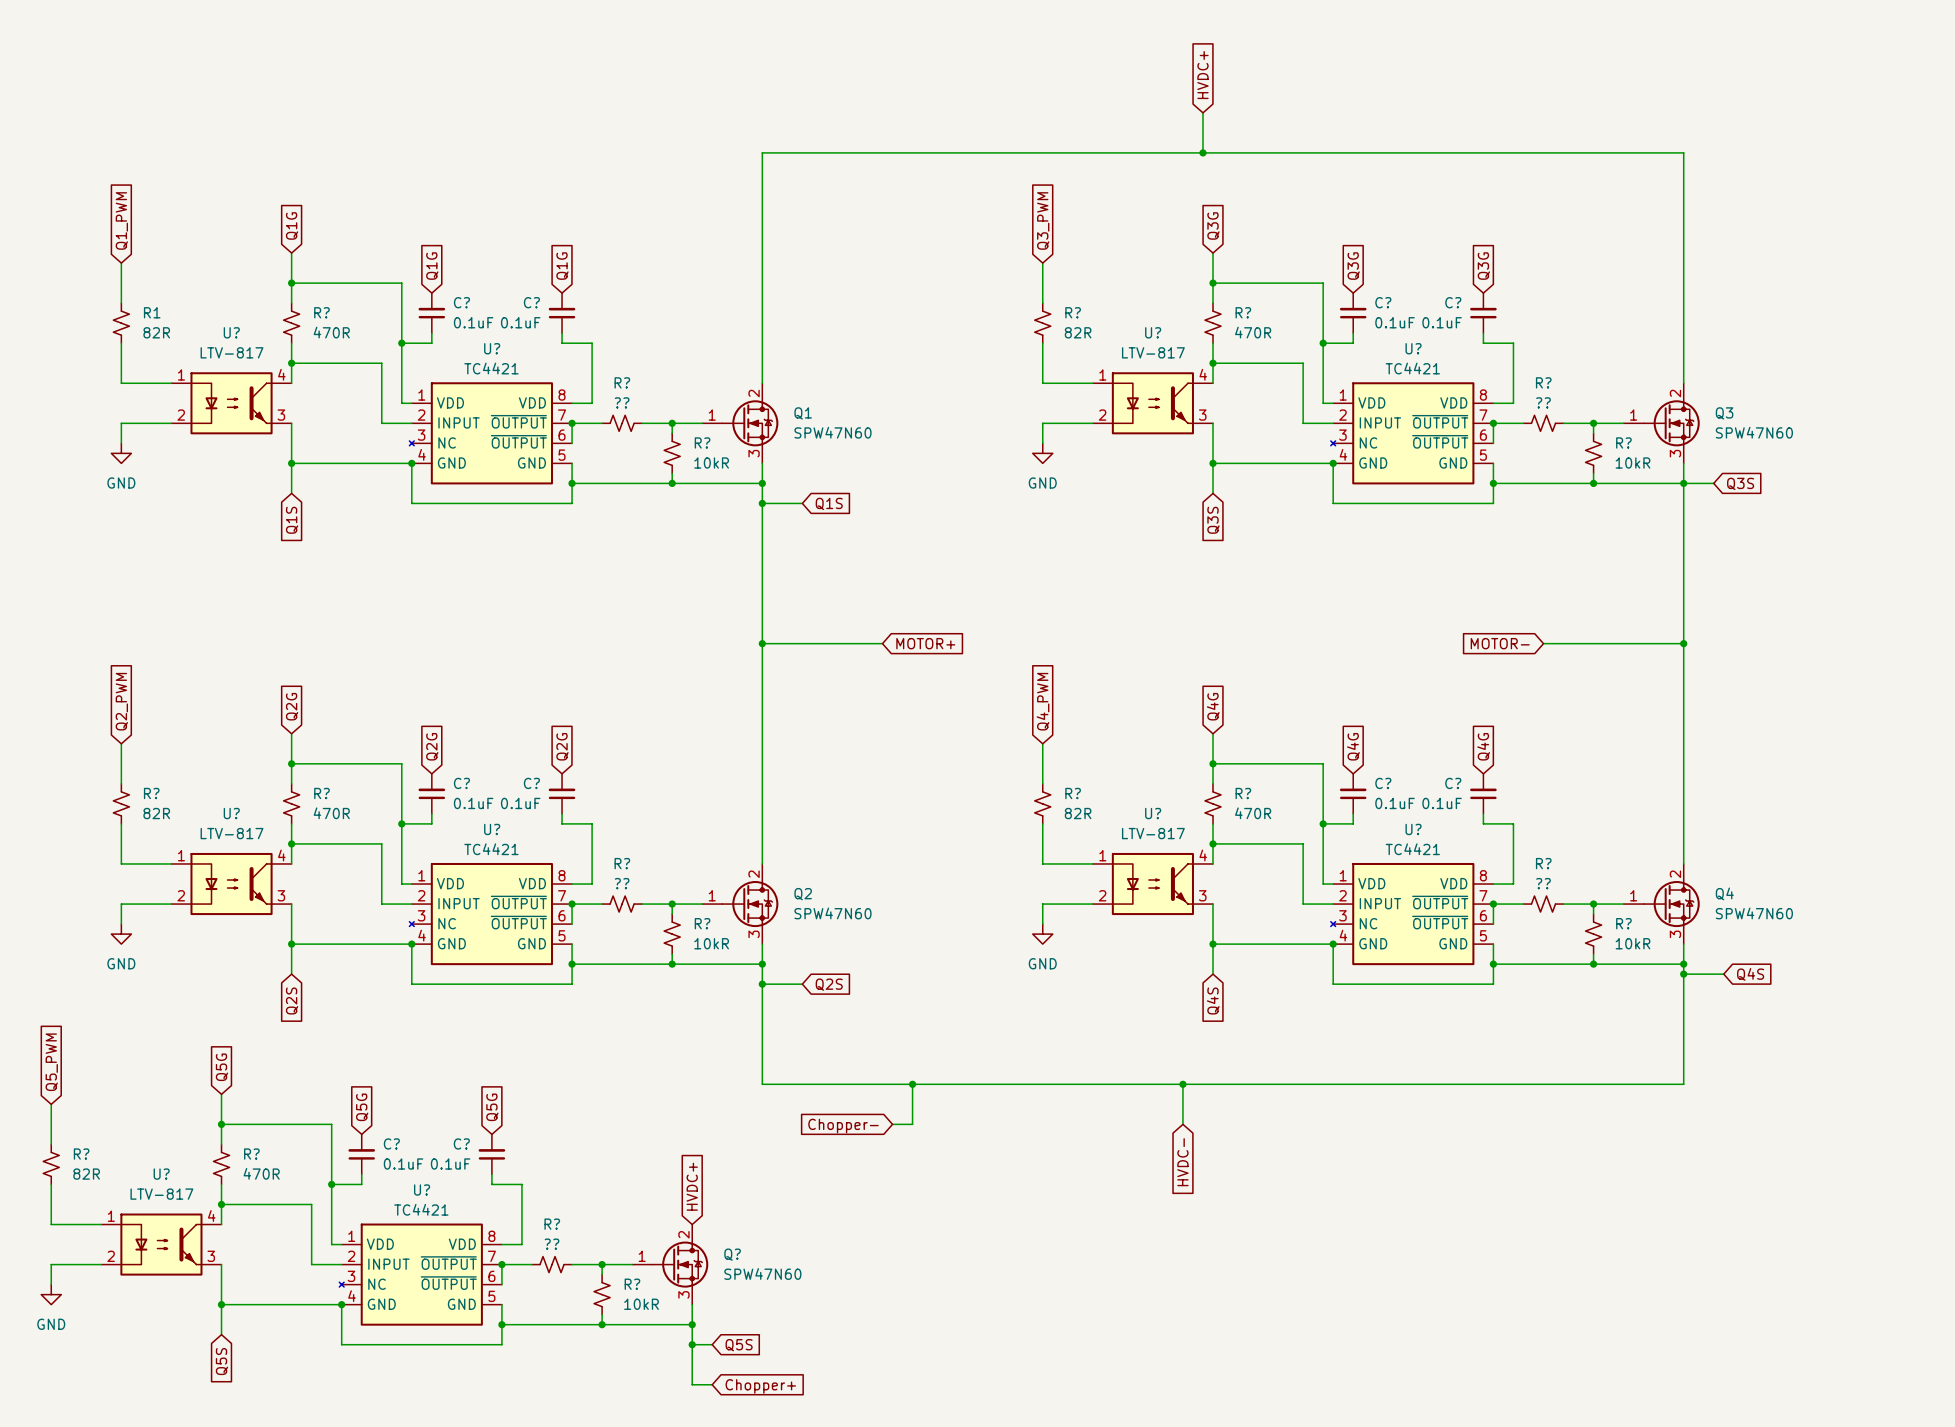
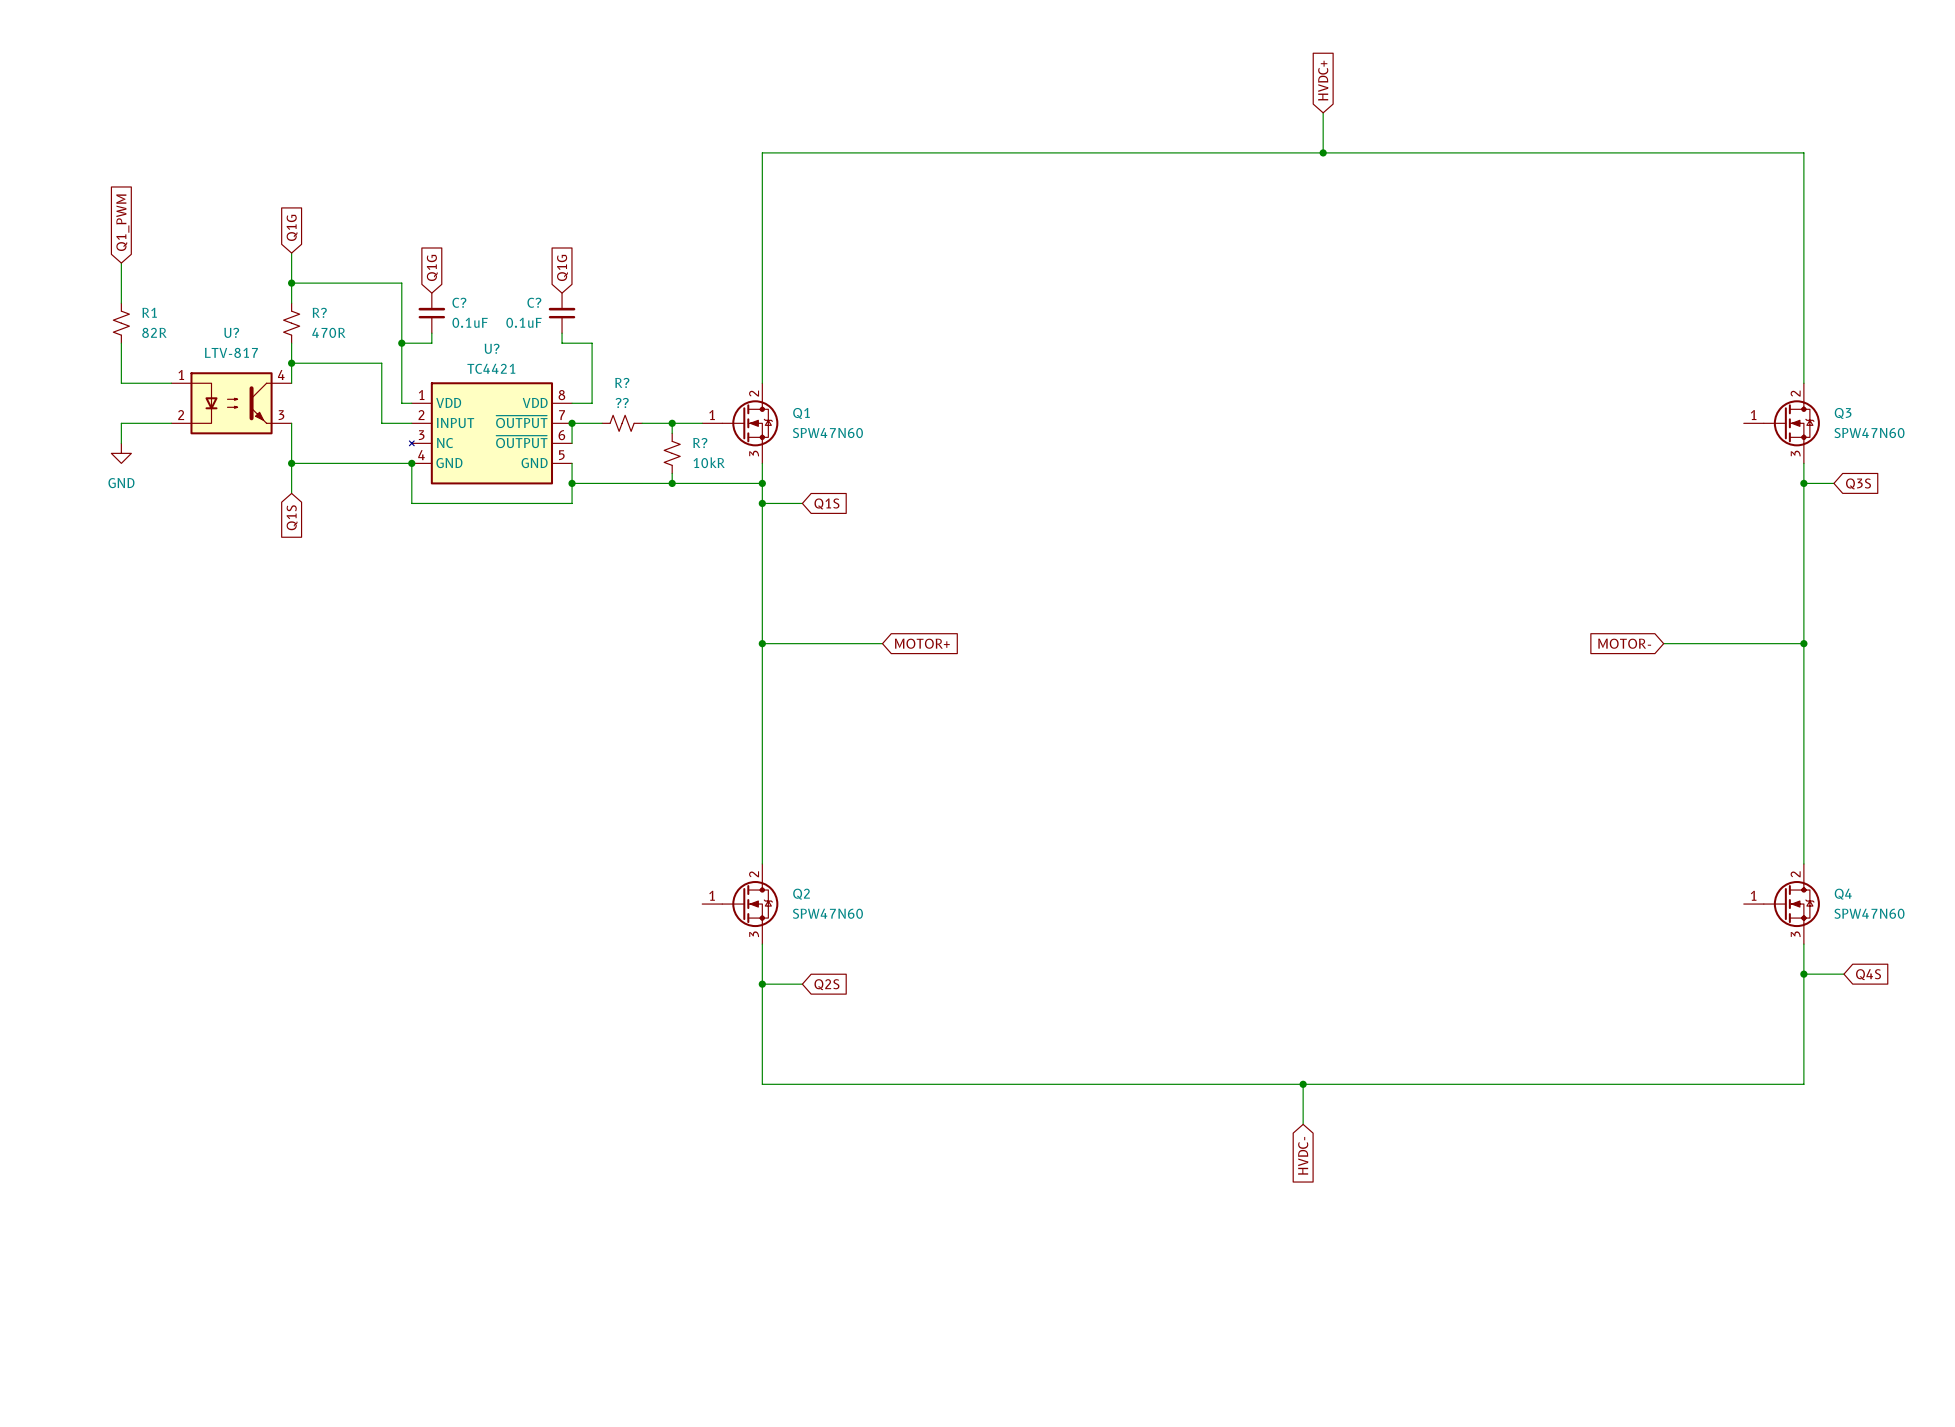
global label position: HVDC+ (1202, 75) -> HVDC+ (1323, 80)
wire: (1202, 112) (1202, 152) -> (1323, 112) (1323, 152)
junction: (1202, 152) -> none
junction: none -> (1323, 152)
wire: (1683, 152) (1683, 383) -> (1683, 152) (1803, 152) (1803, 383)
global label: Q3_PWM (1043, 220) -> none
global label: Q3G (1213, 225) -> none
wire: (1213, 253) (1213, 303) -> none
wire: (1042, 263) (1042, 303) -> none
global label: Q3G (1353, 266) -> none
global label: Q3G (1483, 266) -> none
wire: (1213, 283) (1323, 283) (1323, 403) (1333, 403) -> none
junction: (1213, 283) -> none
C?: 0.1uF (1353, 313) -> none
C?: 0.1uF (1483, 313) -> none
R?: 82R (1042, 323) -> none
R?: 470R (1213, 323) -> none
wire: (1353, 333) (1353, 343) (1323, 343) -> none
wire: (1483, 333) (1483, 343) (1513, 343) (1513, 403) (1493, 403) -> none
wire: (1042, 343) (1042, 383) (1092, 383) -> none
wire: (1213, 343) (1213, 383) -> none
junction: (1323, 343) -> none
wire: (1213, 363) (1303, 363) (1303, 423) (1333, 423) -> none
junction: (1213, 363) -> none
U?: LTV-817 (1152, 403) -> none
wire: (1092, 423) (1042, 423) (1042, 443) -> none
wire: (1213, 423) (1213, 493) -> none
junction: (1493, 423) -> none
wire: (1523, 423) (1493, 423) (1493, 443) -> none
R?: ?? (1543, 423) -> none
wire: (1563, 423) (1623, 423) -> none
wire: (1593, 423) (1593, 433) -> none
junction: (1593, 423) -> none
Q3 position: (1661, 423) -> (1781, 423)
U?: TC4421 (1412, 433) -> none
power symbol: GND (1042, 453) -> none
R?: 10kR (1593, 453) -> none
wire: (1213, 463) (1333, 463) (1333, 503) (1493, 503) (1493, 463) -> none
junction: (1213, 463) -> none
junction: (1333, 463) -> none
wire: (1683, 463) (1683, 863) -> (1803, 463) (1803, 863)
wire: (1593, 473) (1593, 483) -> none
wire: (1493, 483) (1713, 483) -> none
junction: (1493, 483) -> none
junction: (1593, 483) -> none
junction: (1683, 483) -> none
global label position: Q3S (1740, 483) -> Q3S (1858, 483)
wire: none -> (1803, 483) (1833, 483)
junction: none -> (1803, 483)
global label: Q3S (1213, 520) -> none
global label position: MOTOR- (1500, 643) -> MOTOR- (1624, 643)
wire: (1543, 643) (1663, 643) -> (1683, 643) (1803, 643)
junction: (1683, 643) -> none
junction: none -> (1803, 643)
global label: Q2_PWM (121, 701) -> none
global label: Q4_PWM (1042, 701) -> none
global label: Q2G (292, 706) -> none
global label: Q4G (1213, 706) -> none
wire: (291, 733) (291, 783) -> none
wire: (1213, 733) (1213, 783) -> none
wire: (121, 743) (121, 783) -> none
wire: (1042, 743) (1042, 783) -> none
global label: Q2G (432, 746) -> none
global label: Q2G (562, 746) -> none
global label: Q4G (1353, 746) -> none
global label: Q4G (1483, 746) -> none
wire: (291, 763) (401, 763) (401, 884) (411, 884) -> none
junction: (291, 763) -> none
wire: (1213, 763) (1323, 763) (1323, 884) (1333, 884) -> none
junction: (1213, 763) -> none
C?: 0.1uF (431, 793) -> none
C?: 0.1uF (562, 793) -> none
C?: 0.1uF (1353, 793) -> none
C?: 0.1uF (1483, 793) -> none
R?: 82R (121, 803) -> none
R?: 470R (291, 803) -> none
R?: 82R (1042, 803) -> none
R?: 470R (1213, 803) -> none
wire: (431, 813) (431, 823) (401, 823) -> none
wire: (562, 813) (562, 823) (592, 823) (592, 884) (572, 884) -> none
wire: (1353, 813) (1353, 823) (1323, 823) -> none
wire: (1483, 813) (1483, 823) (1513, 823) (1513, 884) (1493, 884) -> none
wire: (121, 823) (121, 863) (171, 863) -> none
wire: (291, 823) (291, 863) -> none
junction: (401, 823) -> none
wire: (1042, 823) (1042, 863) (1092, 863) -> none
wire: (1213, 823) (1213, 863) -> none
junction: (1323, 823) -> none
wire: (291, 843) (381, 843) (381, 904) (411, 904) -> none
junction: (291, 843) -> none
wire: (1213, 843) (1303, 843) (1303, 904) (1333, 904) -> none
junction: (1213, 843) -> none
U?: LTV-817 (231, 884) -> none
U?: LTV-817 (1152, 884) -> none
wire: (171, 904) (121, 904) (121, 924) -> none
wire: (291, 904) (291, 974) -> none
junction: (572, 904) -> none
wire: (602, 904) (572, 904) (572, 924) -> none
R?: ?? (622, 904) -> none
wire: (642, 904) (702, 904) -> none
wire: (672, 904) (672, 914) -> none
junction: (672, 904) -> none
wire: (1092, 904) (1042, 904) (1042, 924) -> none
wire: (1213, 904) (1213, 974) -> none
junction: (1493, 904) -> none
wire: (1523, 904) (1493, 904) (1493, 924) -> none
R?: ?? (1543, 904) -> none
wire: (1563, 904) (1623, 904) -> none
wire: (1593, 904) (1593, 914) -> none
junction: (1593, 904) -> none
Q4 position: (1661, 904) -> (1781, 904)
U?: TC4421 (490, 914) -> none
U?: TC4421 (1412, 914) -> none
power symbol: GND (121, 934) -> none
R?: 10kR (672, 934) -> none
power symbol: GND (1042, 934) -> none
R?: 10kR (1593, 934) -> none
wire: (291, 944) (411, 944) (411, 984) (572, 984) (572, 944) -> none
junction: (291, 944) -> none
junction: (411, 944) -> none
wire: (1213, 944) (1333, 944) (1333, 984) (1493, 984) (1493, 944) -> none
junction: (1213, 944) -> none
junction: (1333, 944) -> none
wire: (1683, 944) (1683, 1084) -> (1803, 944) (1803, 1084) (1683, 1084)
wire: (672, 954) (672, 964) -> none
wire: (1593, 954) (1593, 964) -> none
wire: (572, 964) (762, 964) -> none
junction: (572, 964) -> none
junction: (672, 964) -> none
junction: (762, 964) -> none
wire: (1493, 964) (1683, 964) -> none
junction: (1493, 964) -> none
junction: (1593, 964) -> none
junction: (1683, 964) -> none
wire: (1683, 974) (1723, 974) -> (1803, 974) (1843, 974)
junction: (1683, 974) -> none
global label position: Q4S (1750, 974) -> Q4S (1868, 974)
junction: none -> (1803, 974)
global label: Q2S (292, 1000) -> none
global label: Q4S (1213, 1000) -> none
global label: Q5_PWM (51, 1062) -> none
global label: Q5G (221, 1067) -> none
wire: (912, 1084) (912, 1124) (892, 1124) -> none
junction: (912, 1084) -> none
wire: (1182, 1084) (1182, 1124) -> (1303, 1084) (1303, 1124)
junction: (1182, 1084) -> none
junction: none -> (1303, 1084)
wire: (221, 1094) (221, 1144) -> none
wire: (51, 1104) (51, 1144) -> none
global label: Q5G (362, 1107) -> none
global label: Q5G (492, 1107) -> none
wire: (221, 1124) (331, 1124) (331, 1244) (341, 1244) -> none
junction: (221, 1124) -> none
global label: Chopper- (843, 1126) -> none
C?: 0.1uF (361, 1154) -> none
C?: 0.1uF (491, 1154) -> none
global label position: HVDC- (1182, 1162) -> HVDC- (1303, 1155)
R?: 82R (51, 1164) -> none
R?: 470R (221, 1164) -> none
wire: (361, 1174) (361, 1184) (331, 1184) -> none
wire: (491, 1174) (491, 1184) (521, 1184) (521, 1244) (501, 1244) -> none
wire: (51, 1184) (51, 1224) (101, 1224) -> none
wire: (221, 1184) (221, 1224) -> none
junction: (331, 1184) -> none
global label: HVDC+ (692, 1186) -> none
wire: (221, 1204) (311, 1204) (311, 1264) (341, 1264) -> none
junction: (221, 1204) -> none
U?: LTV-817 (161, 1244) -> none
wire: (101, 1264) (51, 1264) (51, 1284) -> none
wire: (221, 1264) (221, 1334) -> none
junction: (501, 1264) -> none
wire: (531, 1264) (501, 1264) (501, 1284) -> none
R?: ?? (552, 1264) -> none
wire: (572, 1264) (632, 1264) -> none
wire: (602, 1264) (602, 1274) -> none
junction: (602, 1264) -> none
Q?: SPW47N60 (670, 1264) -> none
U?: TC4421 (420, 1274) -> none
power symbol: GND (51, 1294) -> none
R?: 10kR (602, 1294) -> none
wire: (221, 1304) (341, 1304) (341, 1344) (501, 1344) (501, 1304) -> none
junction: (221, 1304) -> none
junction: (341, 1304) -> none
wire: (692, 1304) (692, 1384) (712, 1384) -> none
wire: (602, 1314) (602, 1324) -> none
wire: (501, 1324) (692, 1324) -> none
junction: (501, 1324) -> none
junction: (602, 1324) -> none
junction: (692, 1324) -> none
wire: (692, 1344) (712, 1344) -> none
junction: (692, 1344) -> none
global label: Q5S (739, 1345) -> none
global label: Q5S (221, 1361) -> none
global label: Chopper+ (760, 1386) -> none

